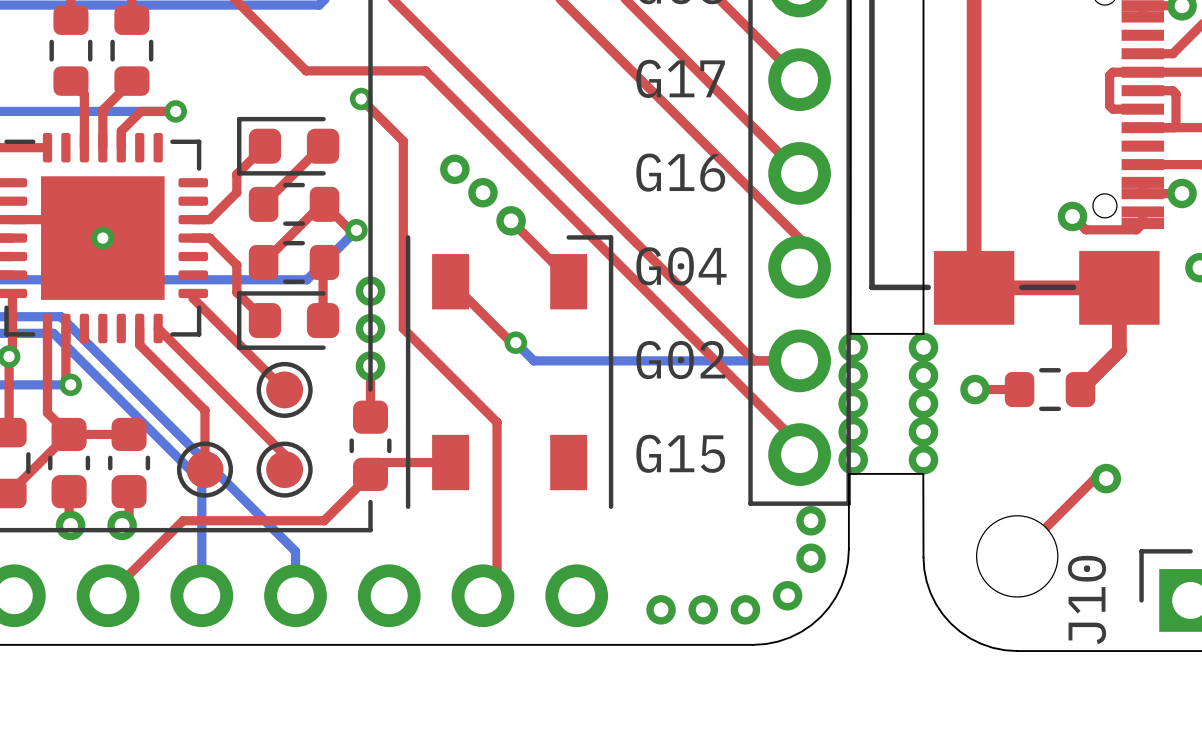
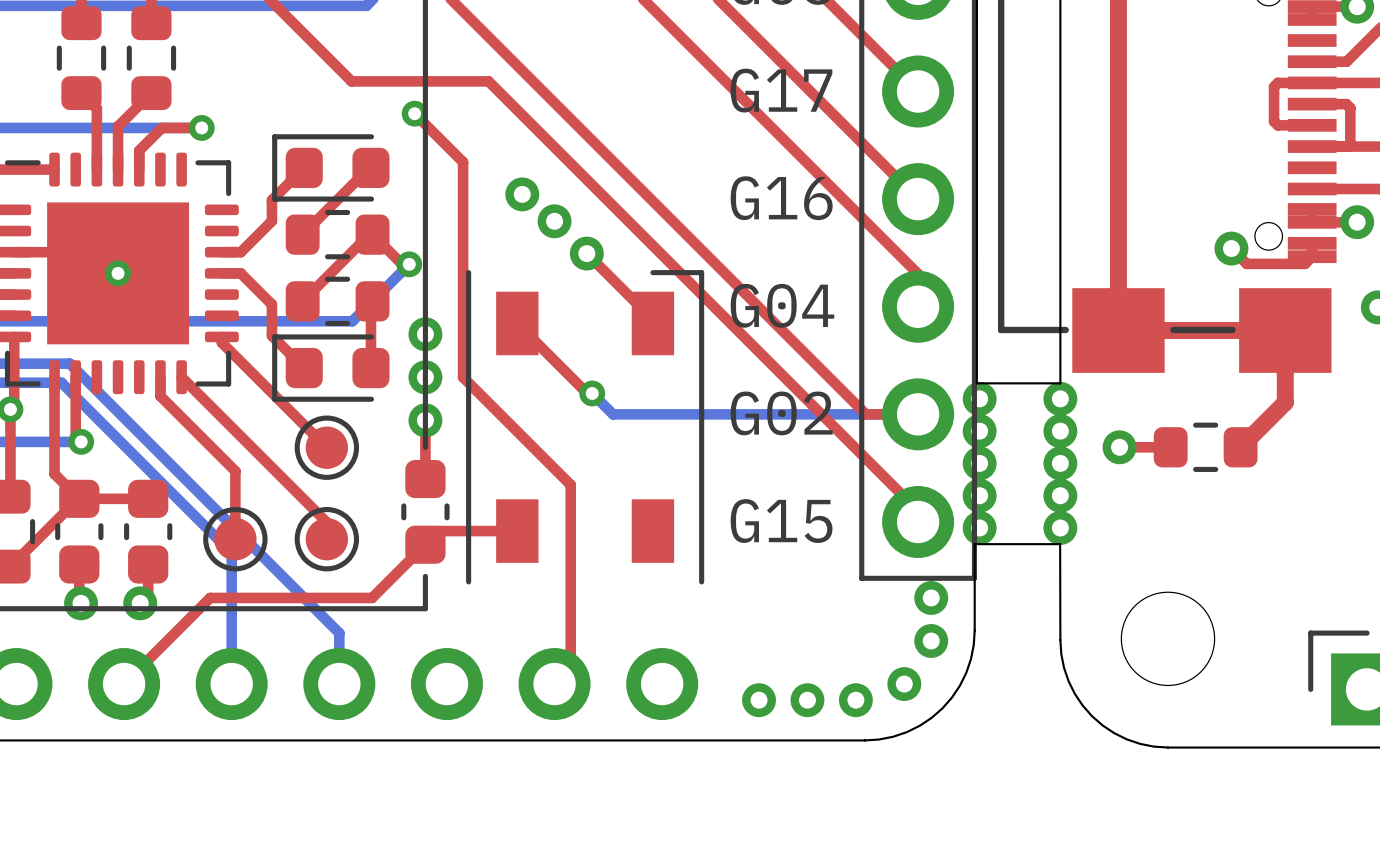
top track: (1106, 478) (1095, 478) (1017, 556) -> none
via: (1106, 478) -> none
J10 name: J10 (1087, 599) -> none

